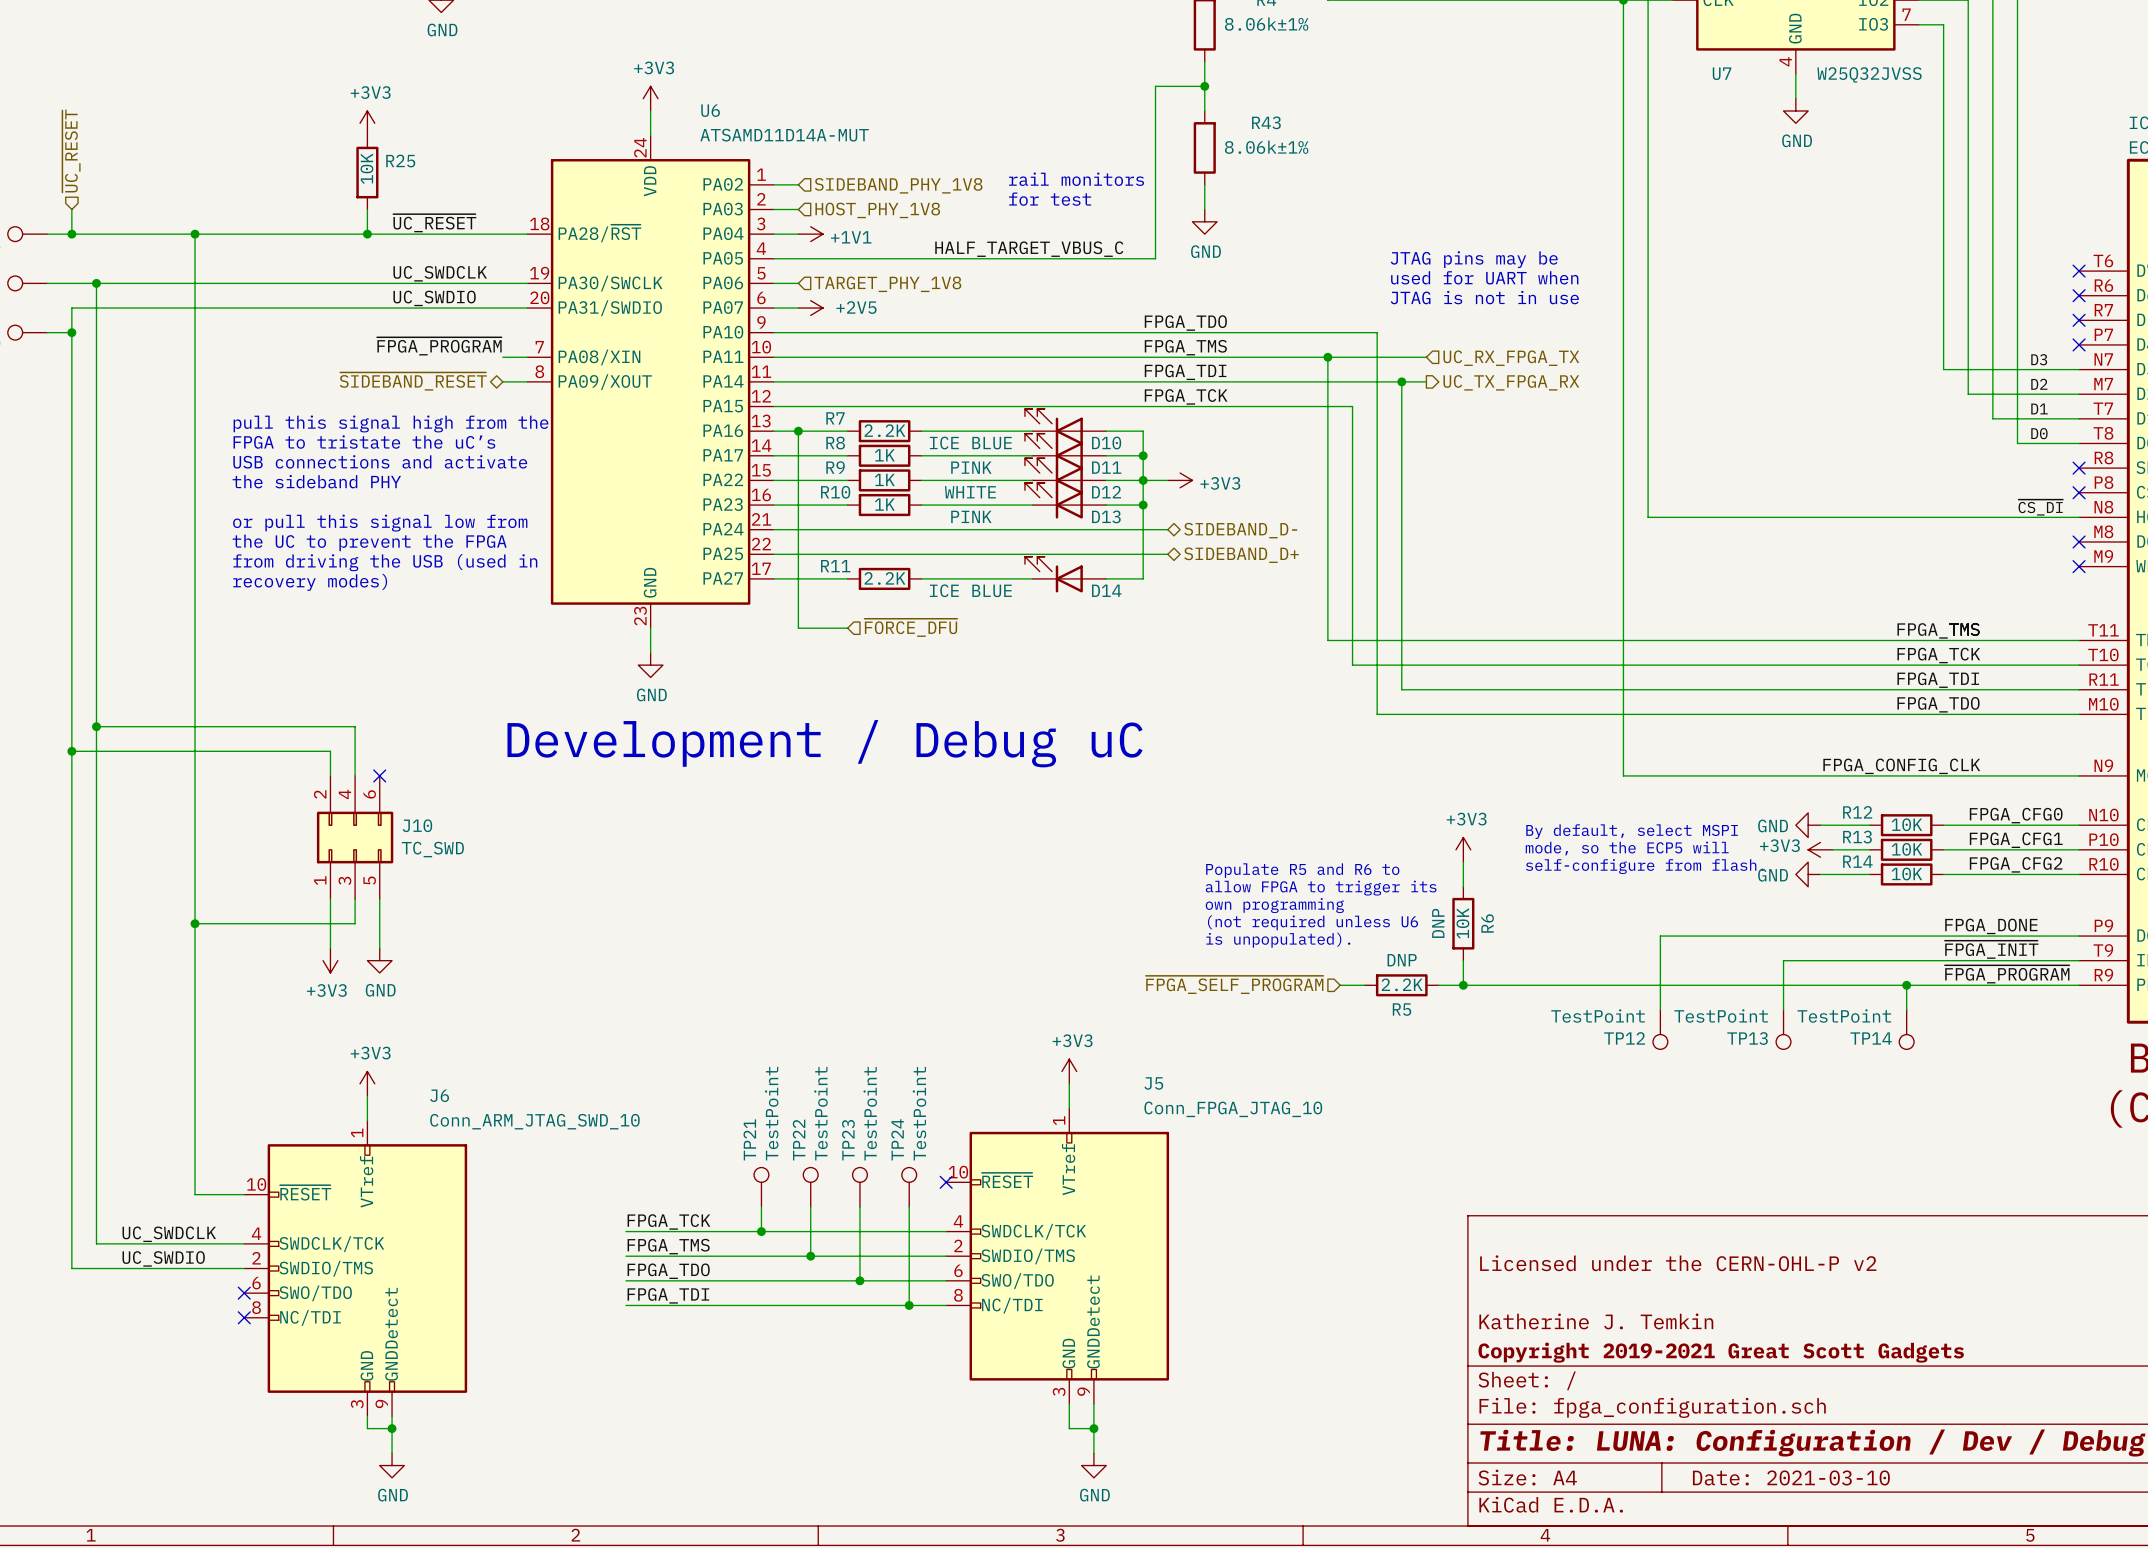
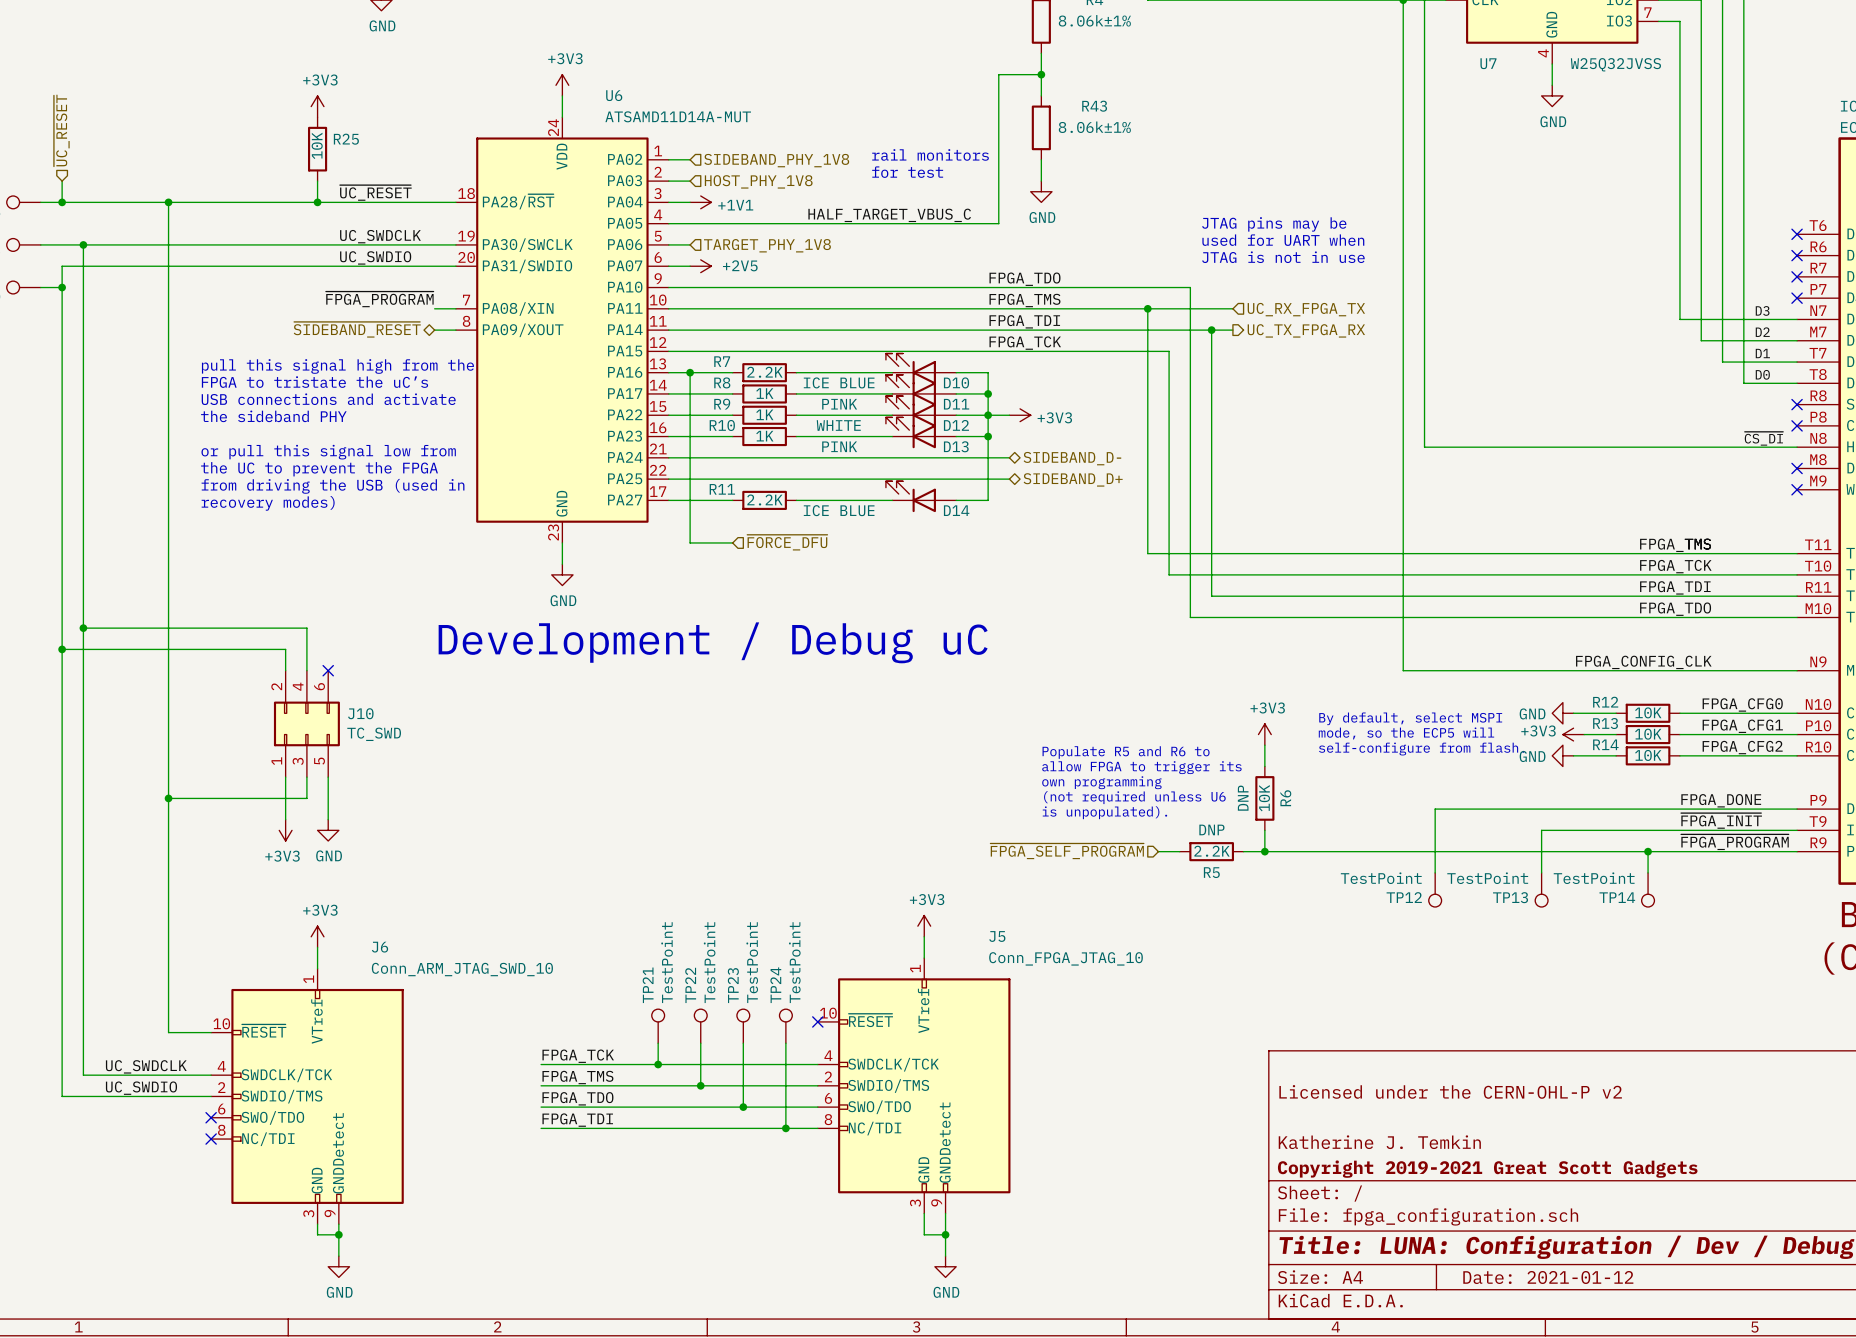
title block: Date: 2021-03-10 (1791, 1477) -> Date: 2021-01-12 (1548, 1277)

